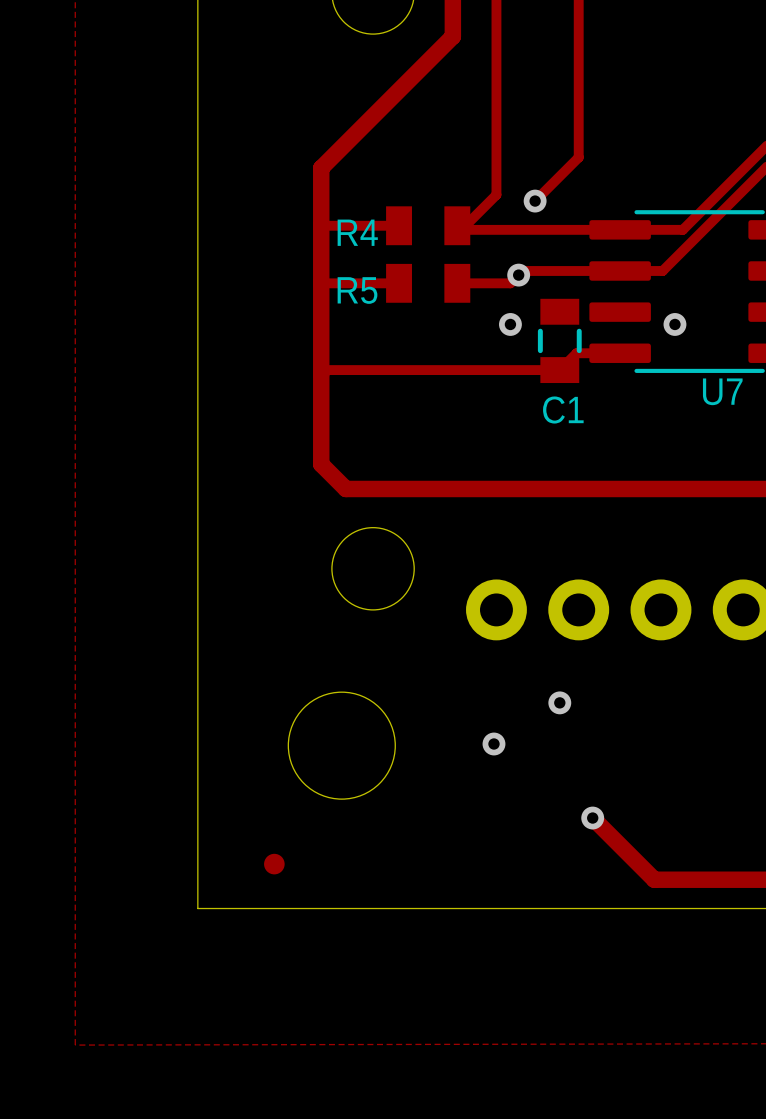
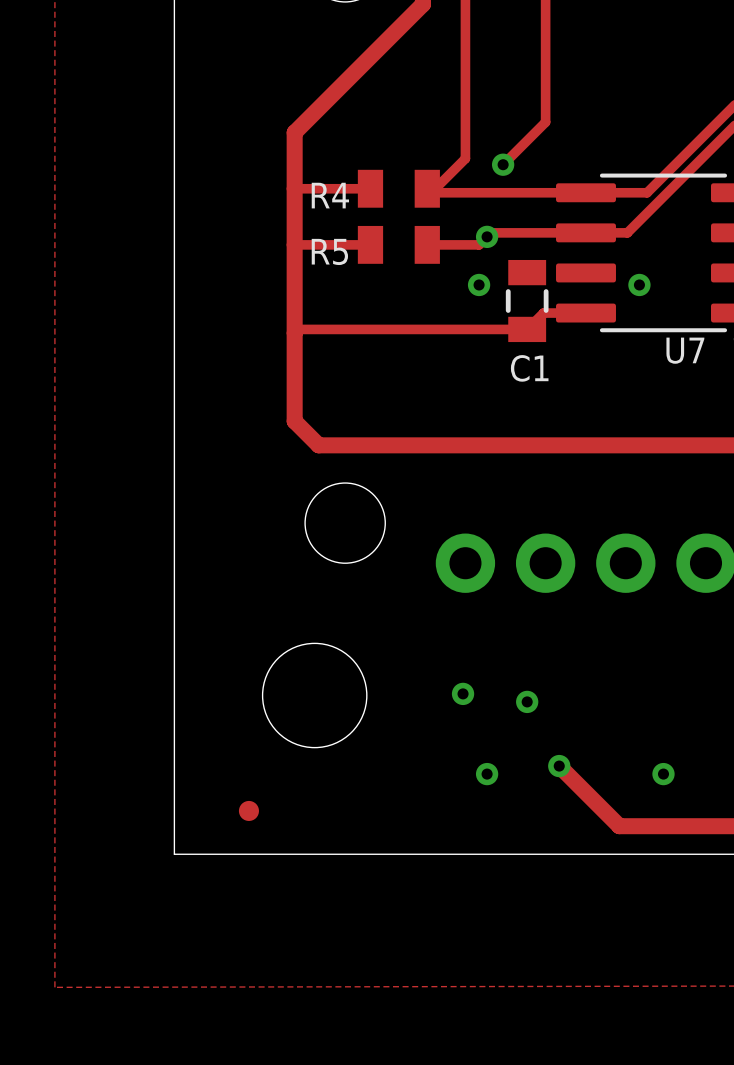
via position: (559, 702) -> (527, 701)
via: none -> (487, 774)
via: none -> (663, 774)

